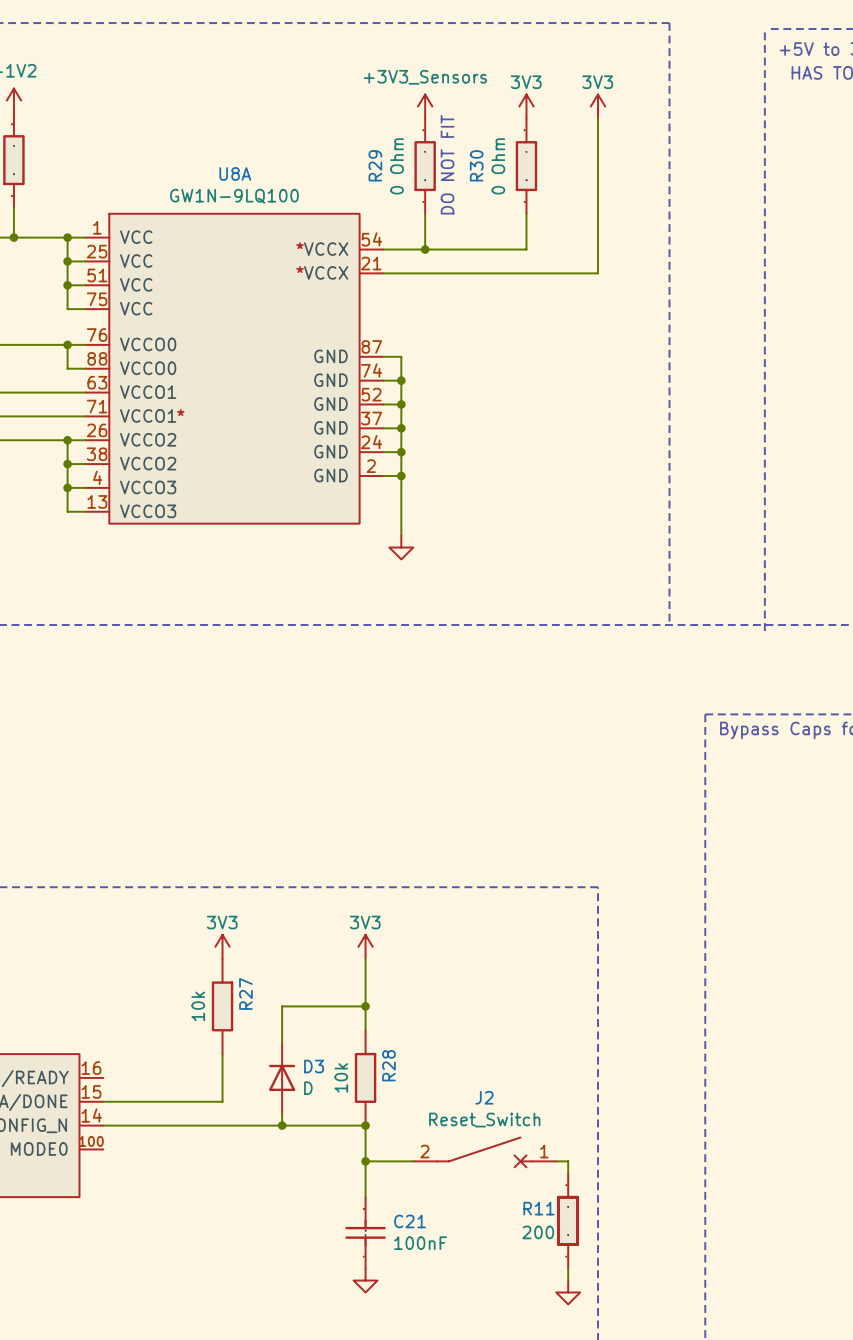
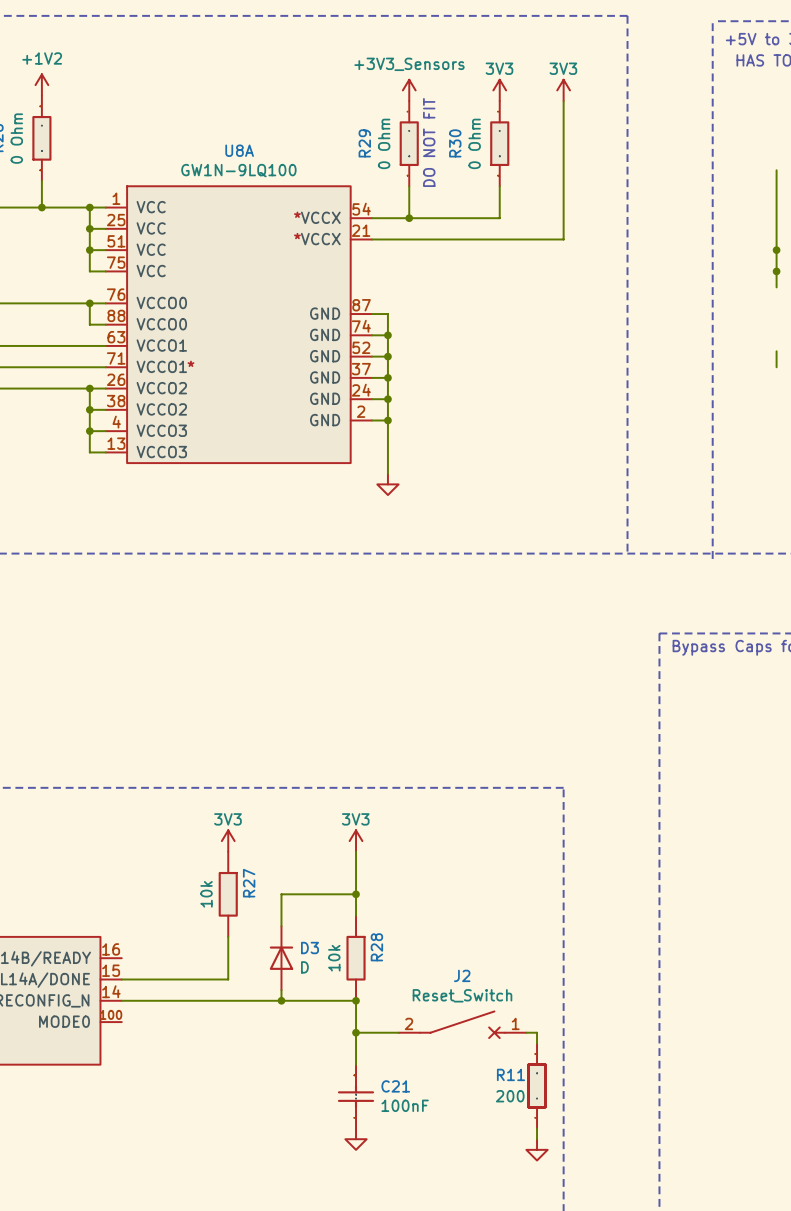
wire: none -> (776, 170) (776, 287)
junction: none -> (776, 250)
junction: none -> (776, 271)
wire: none -> (776, 351) (776, 367)

